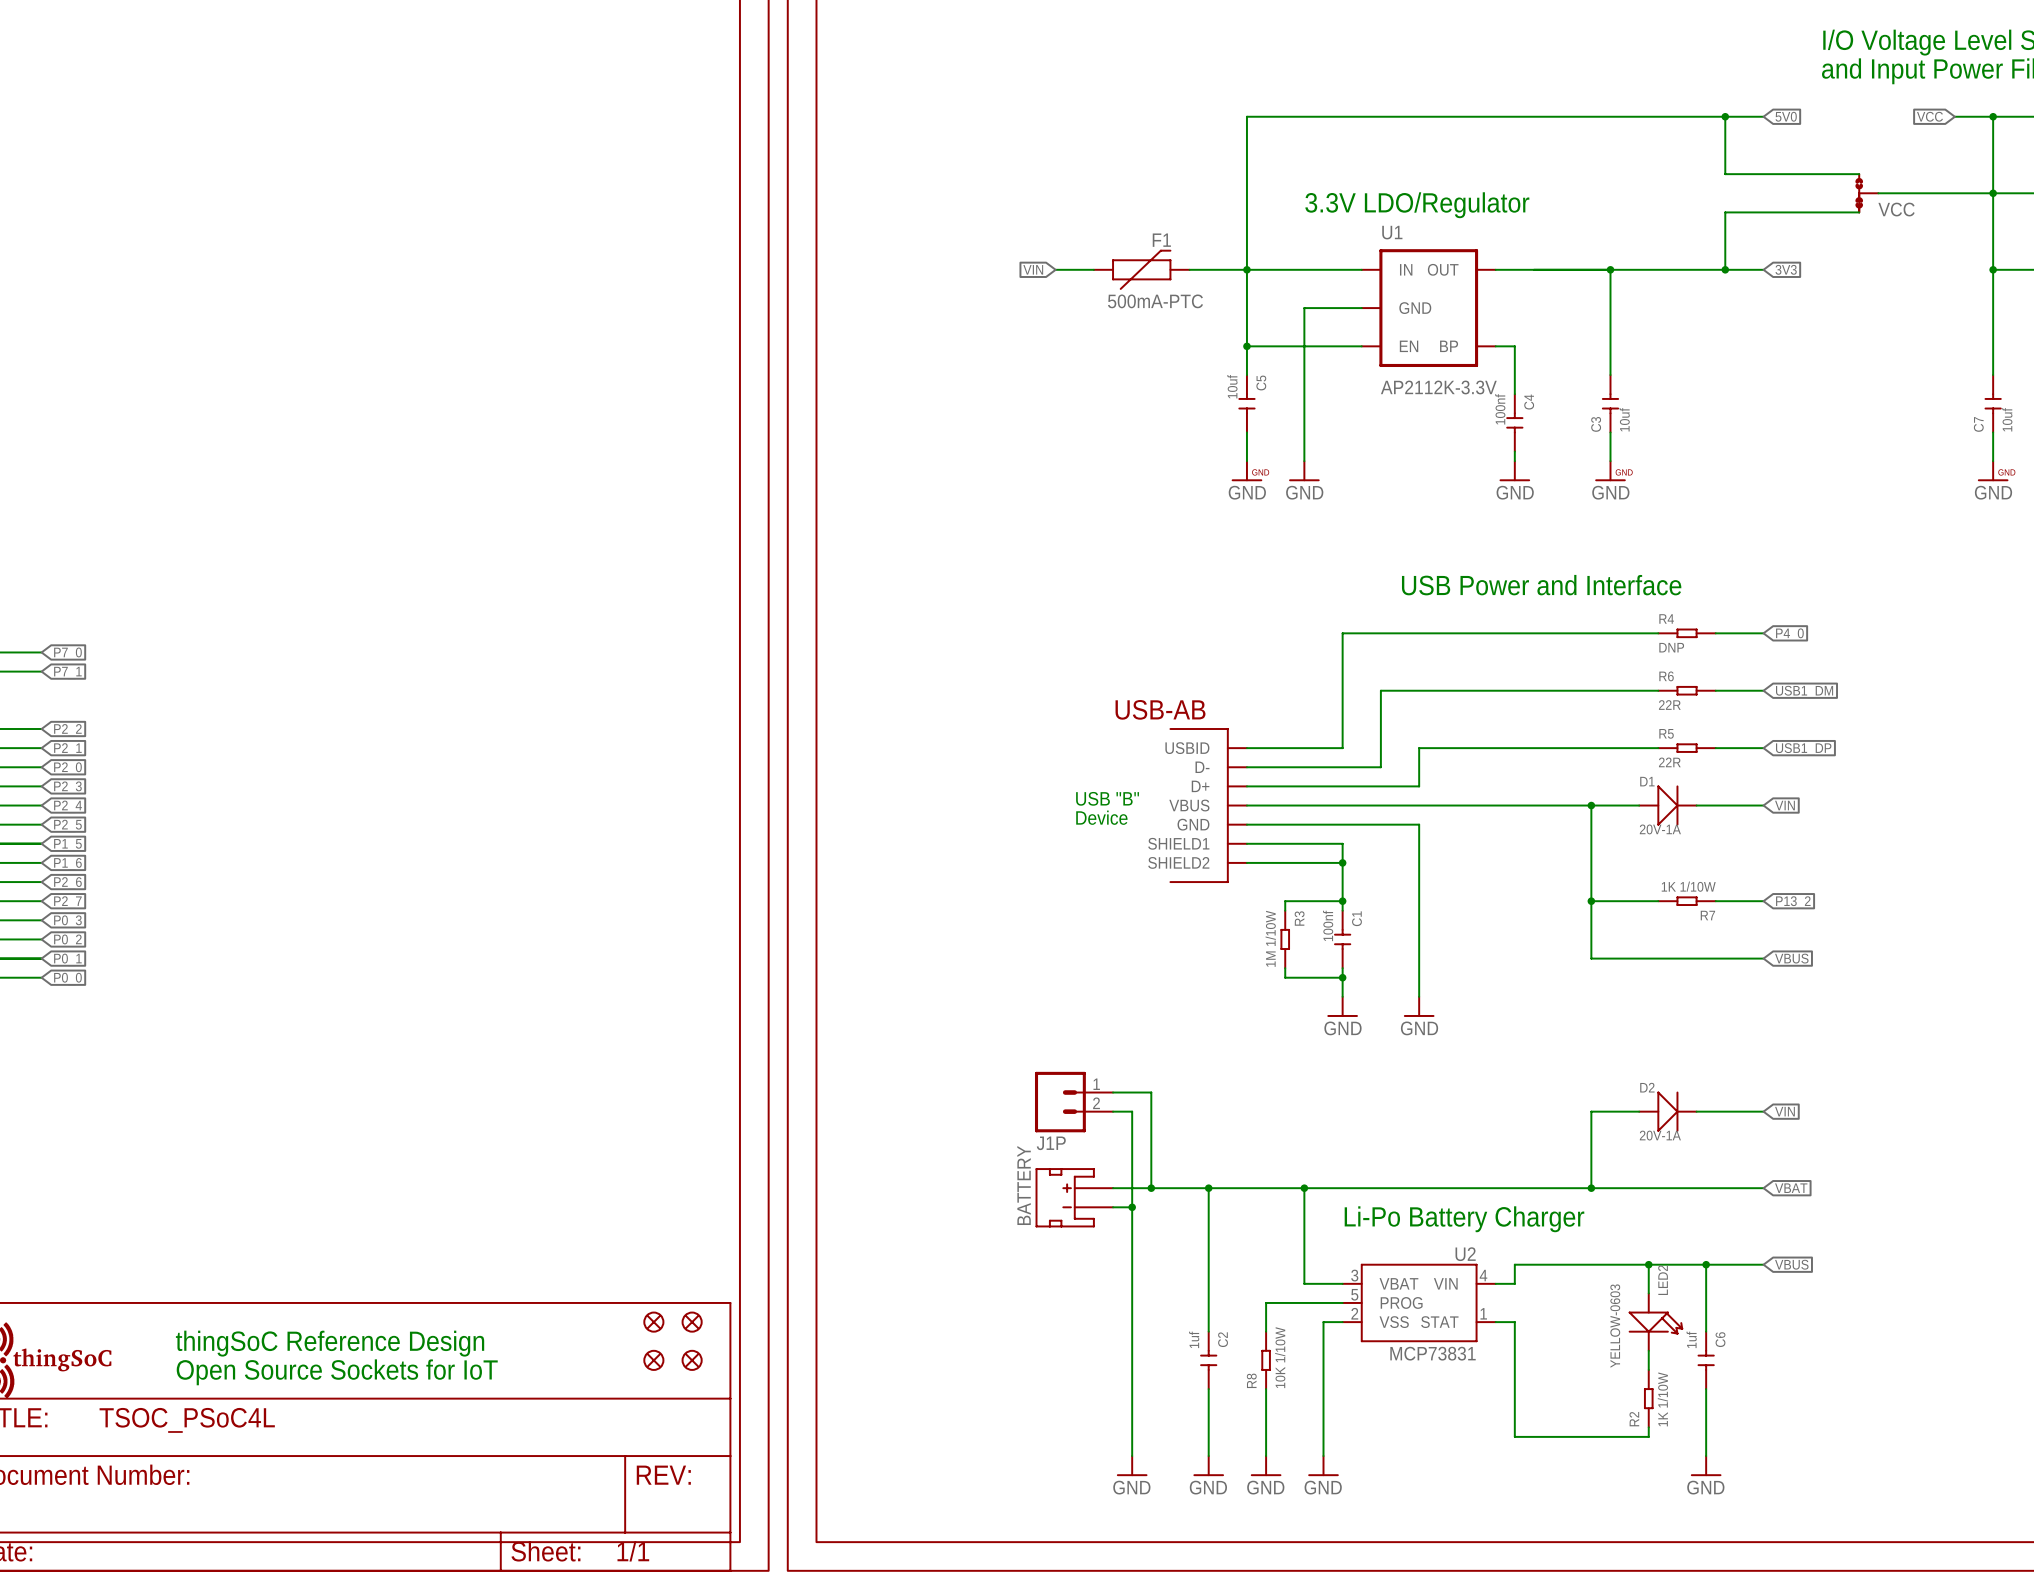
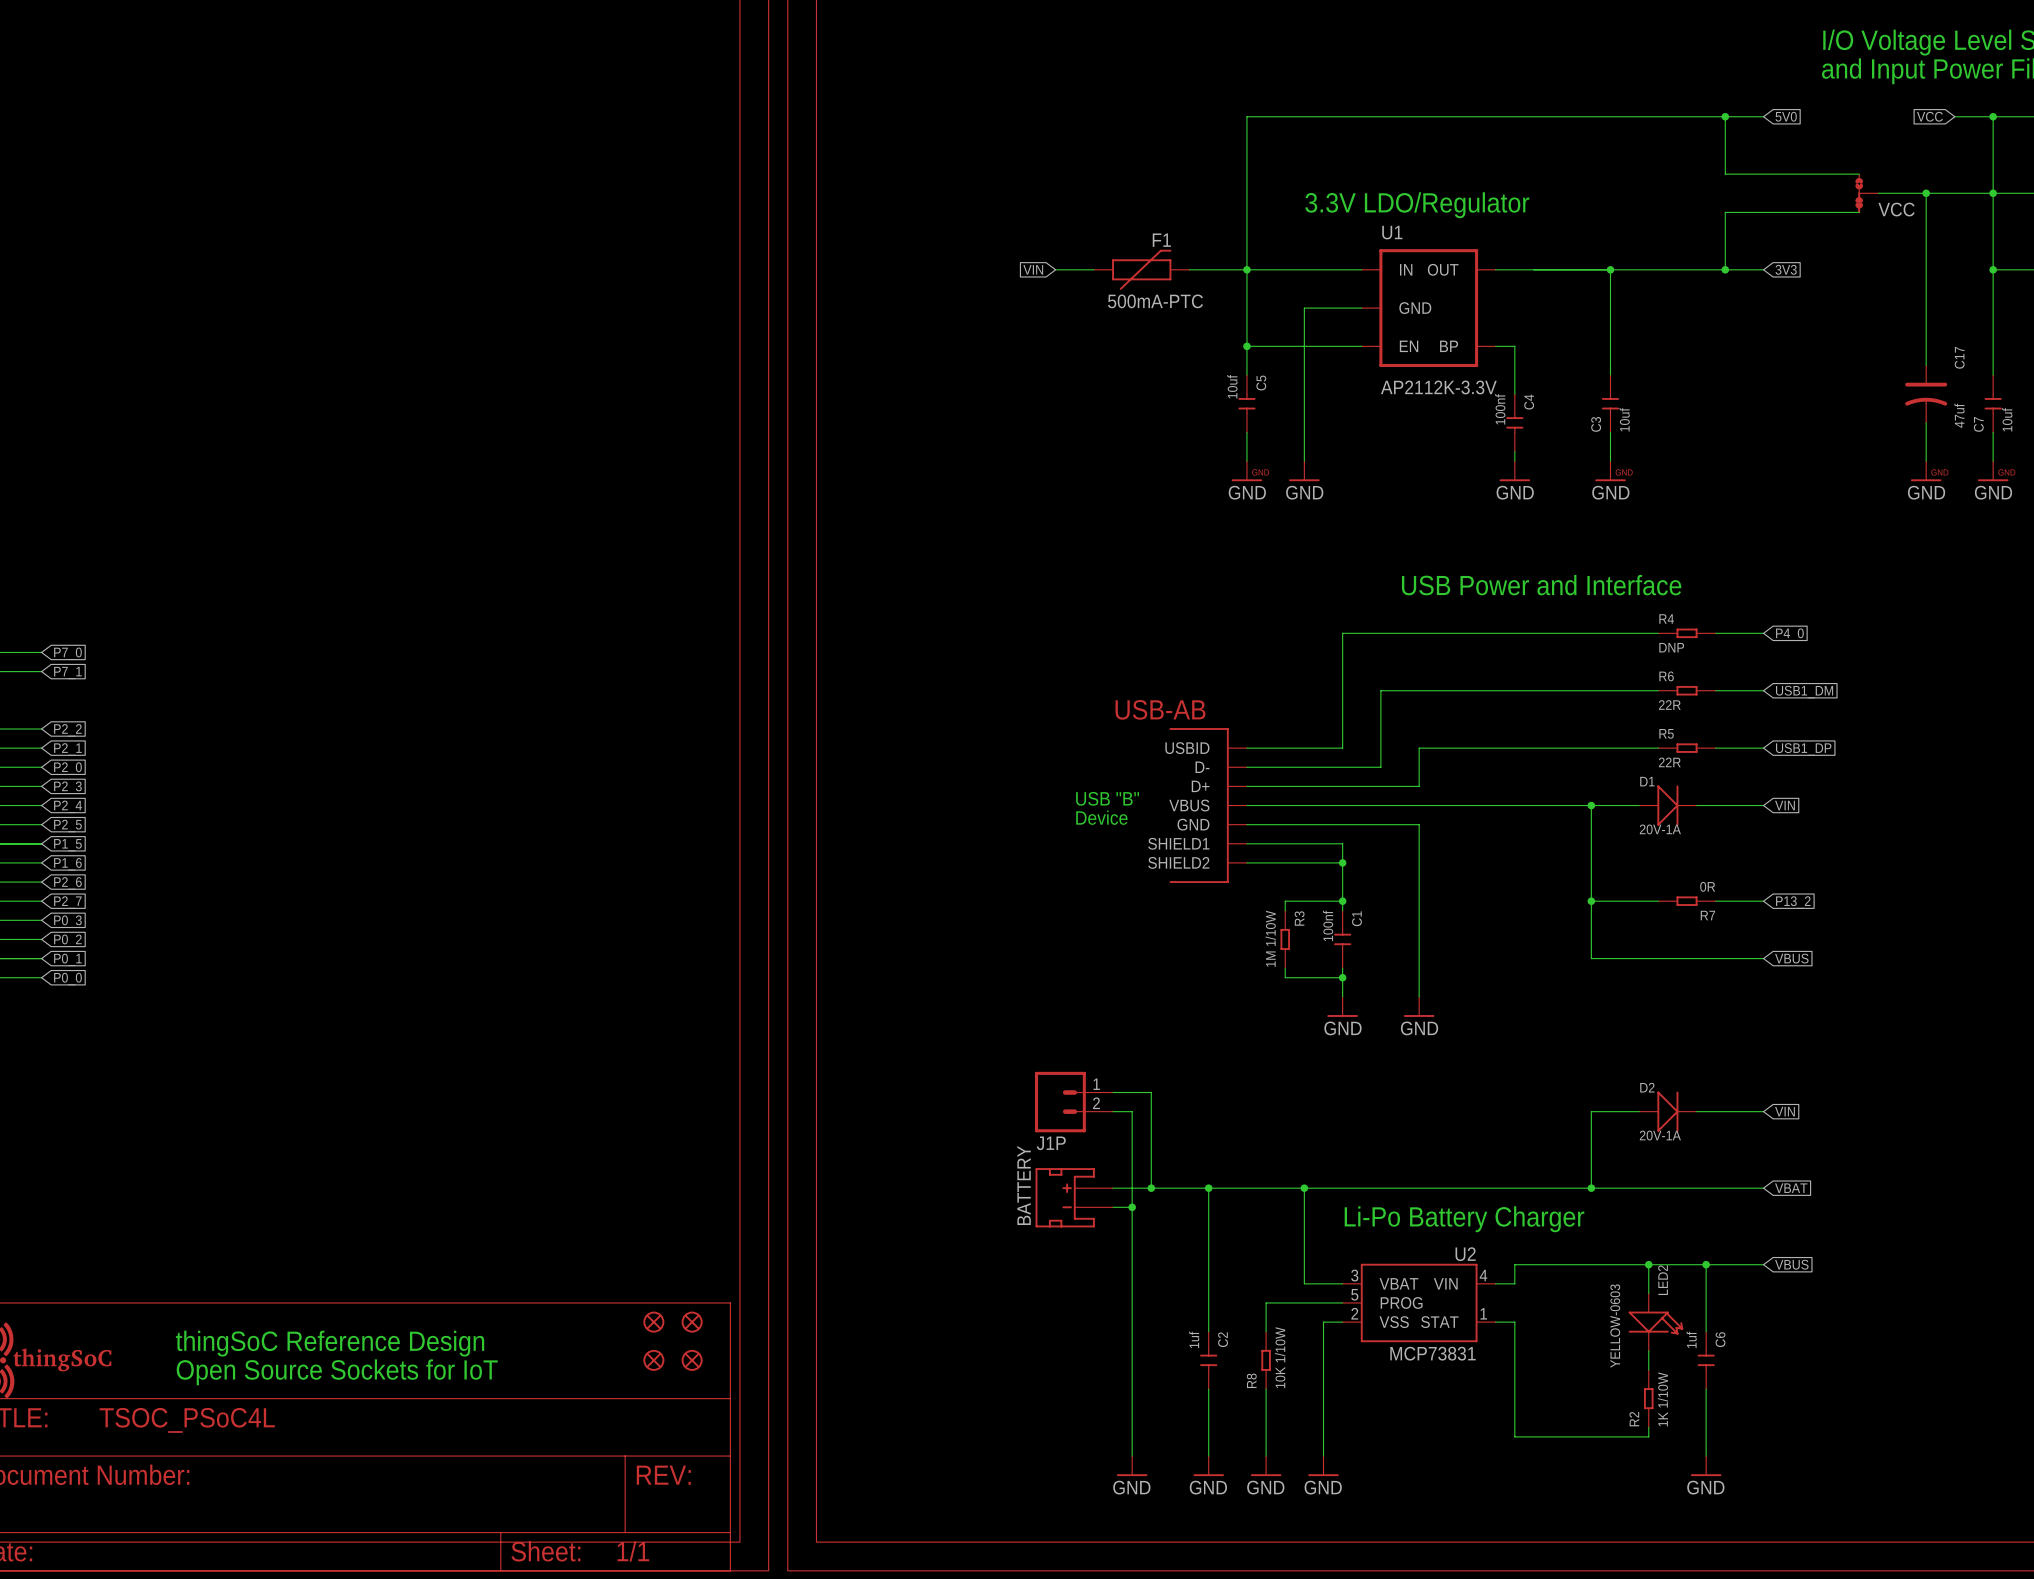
wire: none -> (1926, 193) (1926, 365)
junction: none -> (1926, 193)
C17: none -> 47uf (1926, 394)
wire: none -> (1926, 422) (1926, 461)
power symbol: none -> GND (1926, 471)
R7 value: 1K 1/10W (1688, 886) -> 0R (1707, 886)

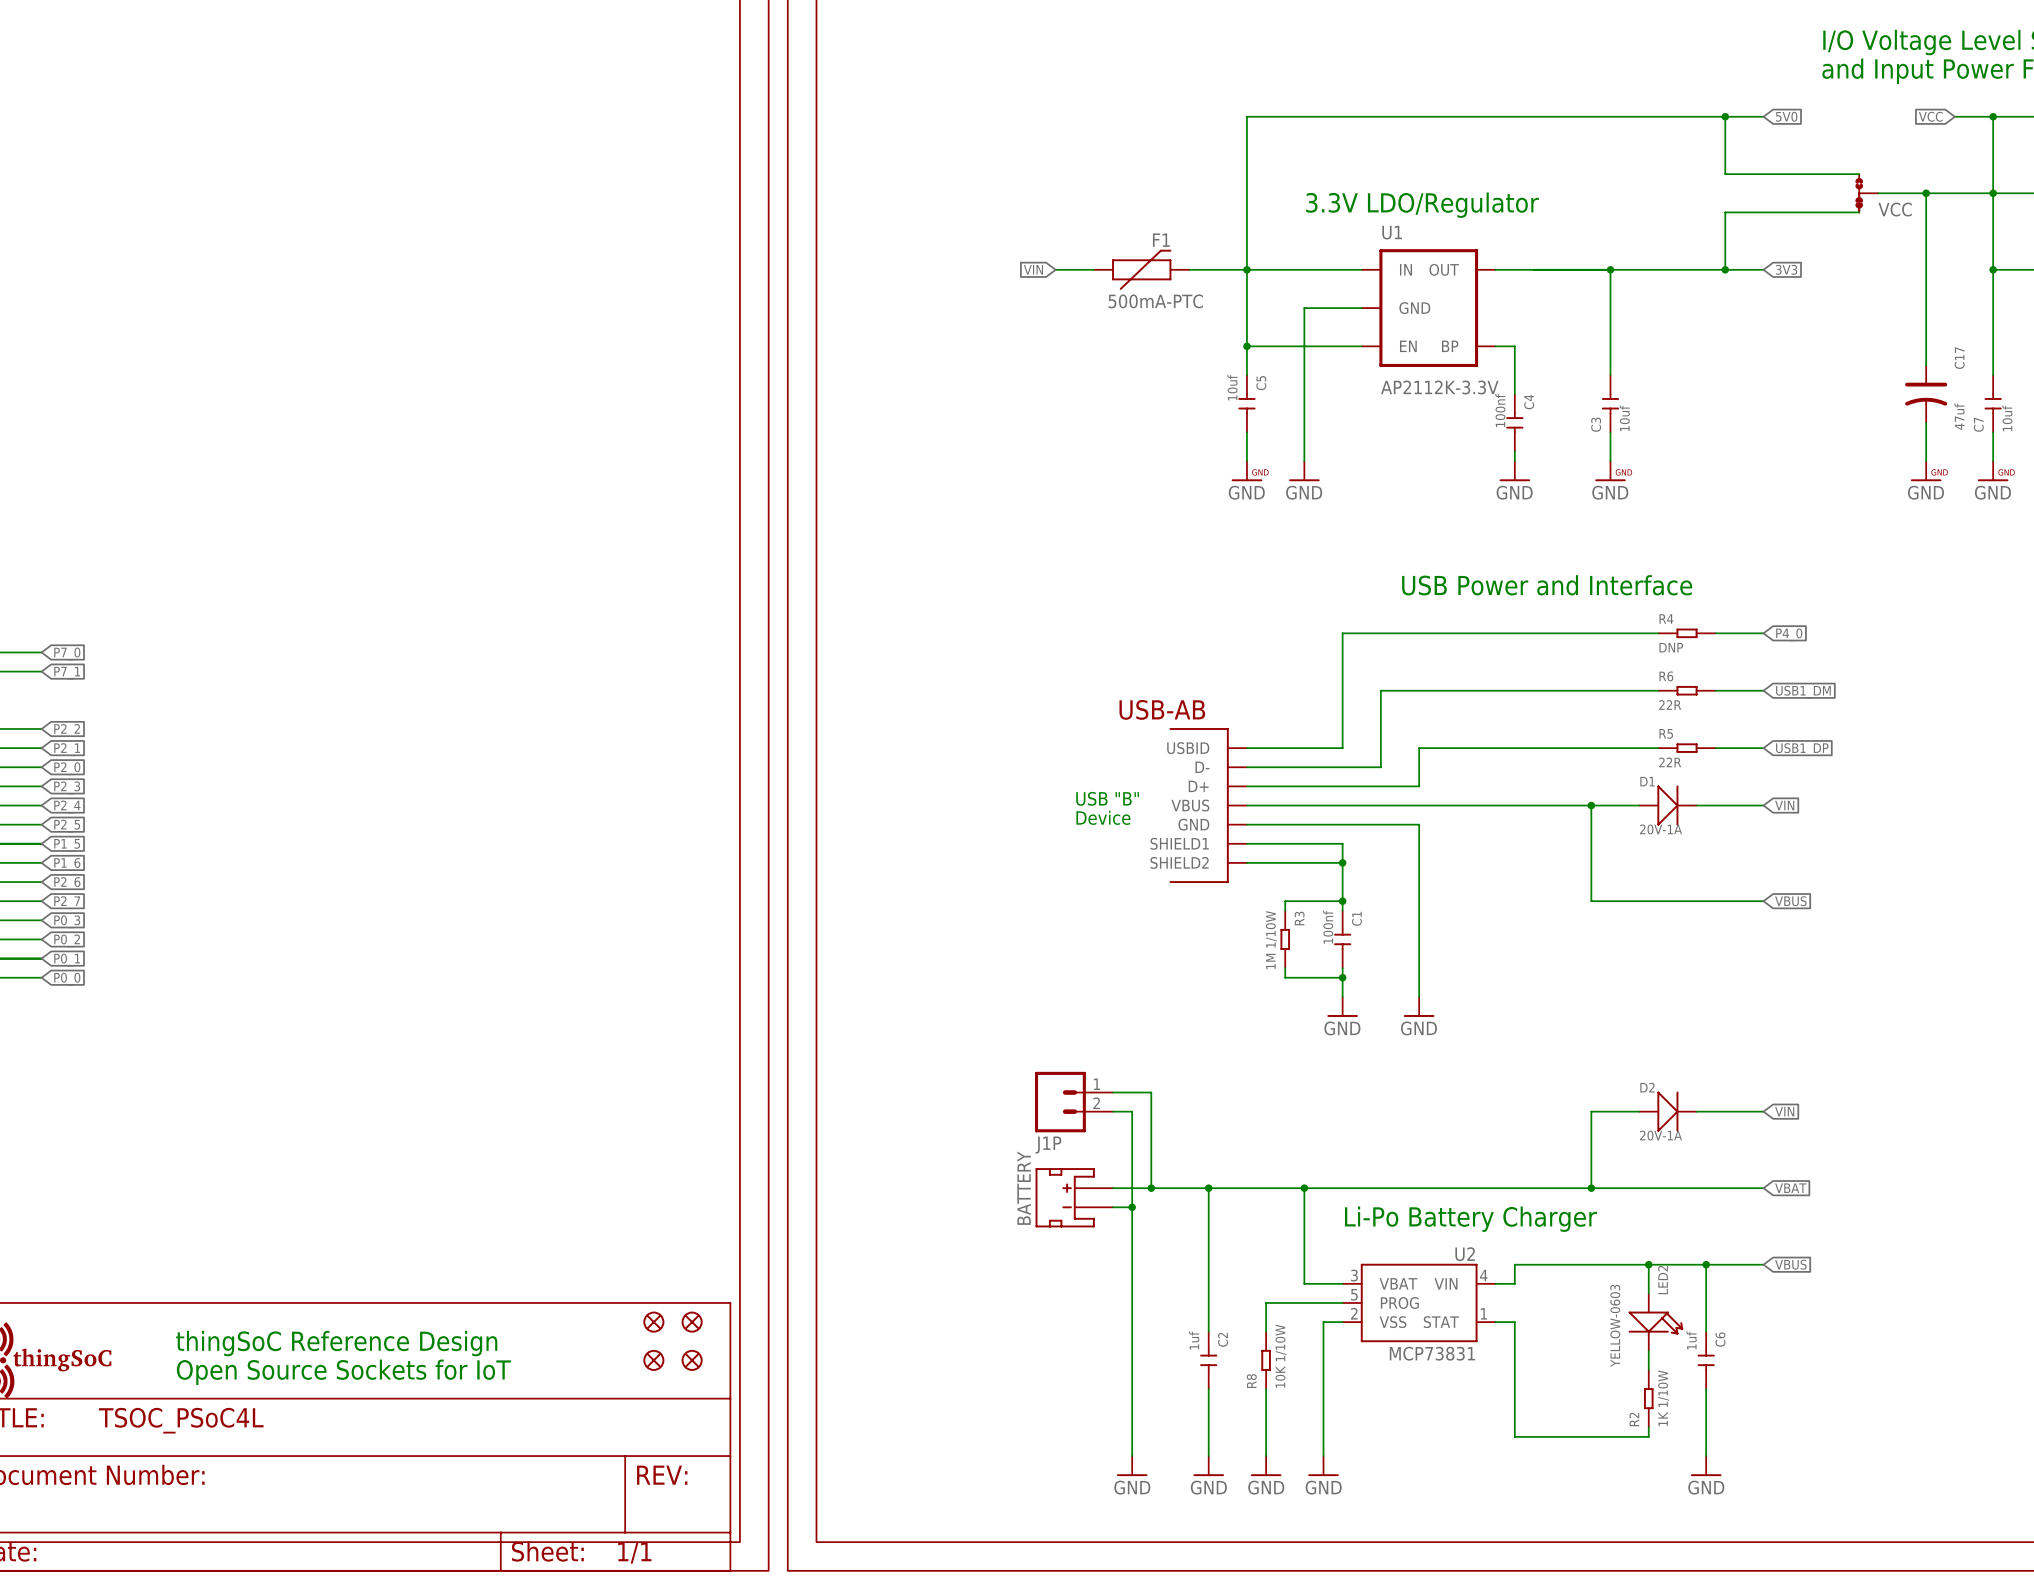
wire: (1591, 901) (1591, 958) (1763, 958) -> none
junction: (1591, 901) -> none
R7: 0R (1687, 901) -> none
global label: P13_2 (1793, 902) -> VBUS (1790, 901)
global label: VBUS (1791, 958) -> none

